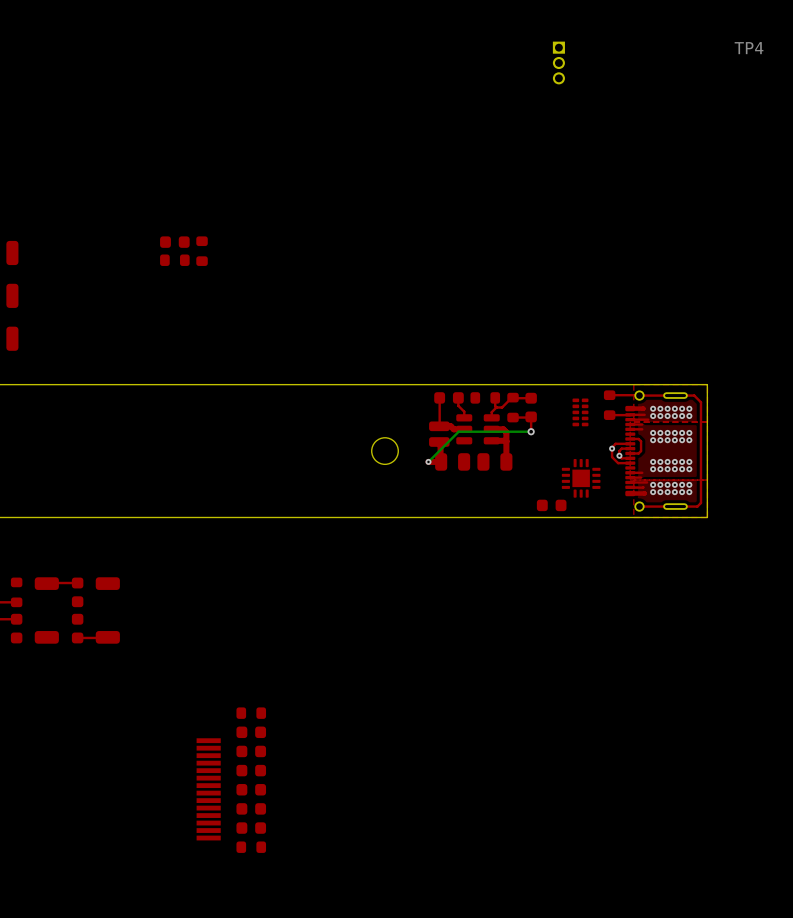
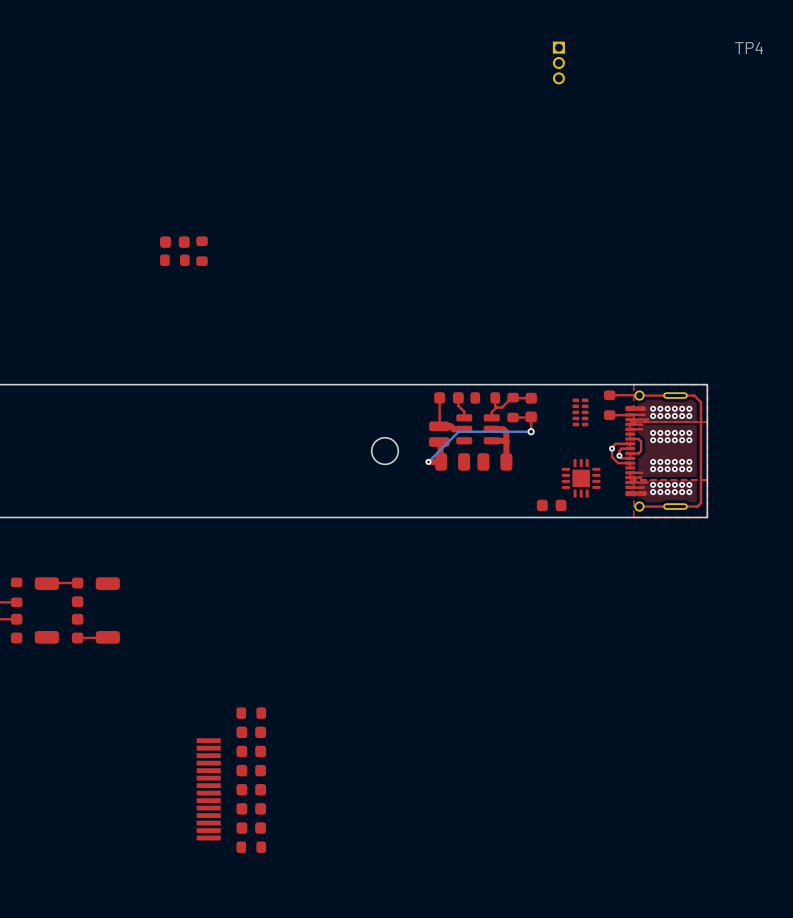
part: (12, 252) -> none
part: (12, 295) -> none
part: (12, 338) -> none

